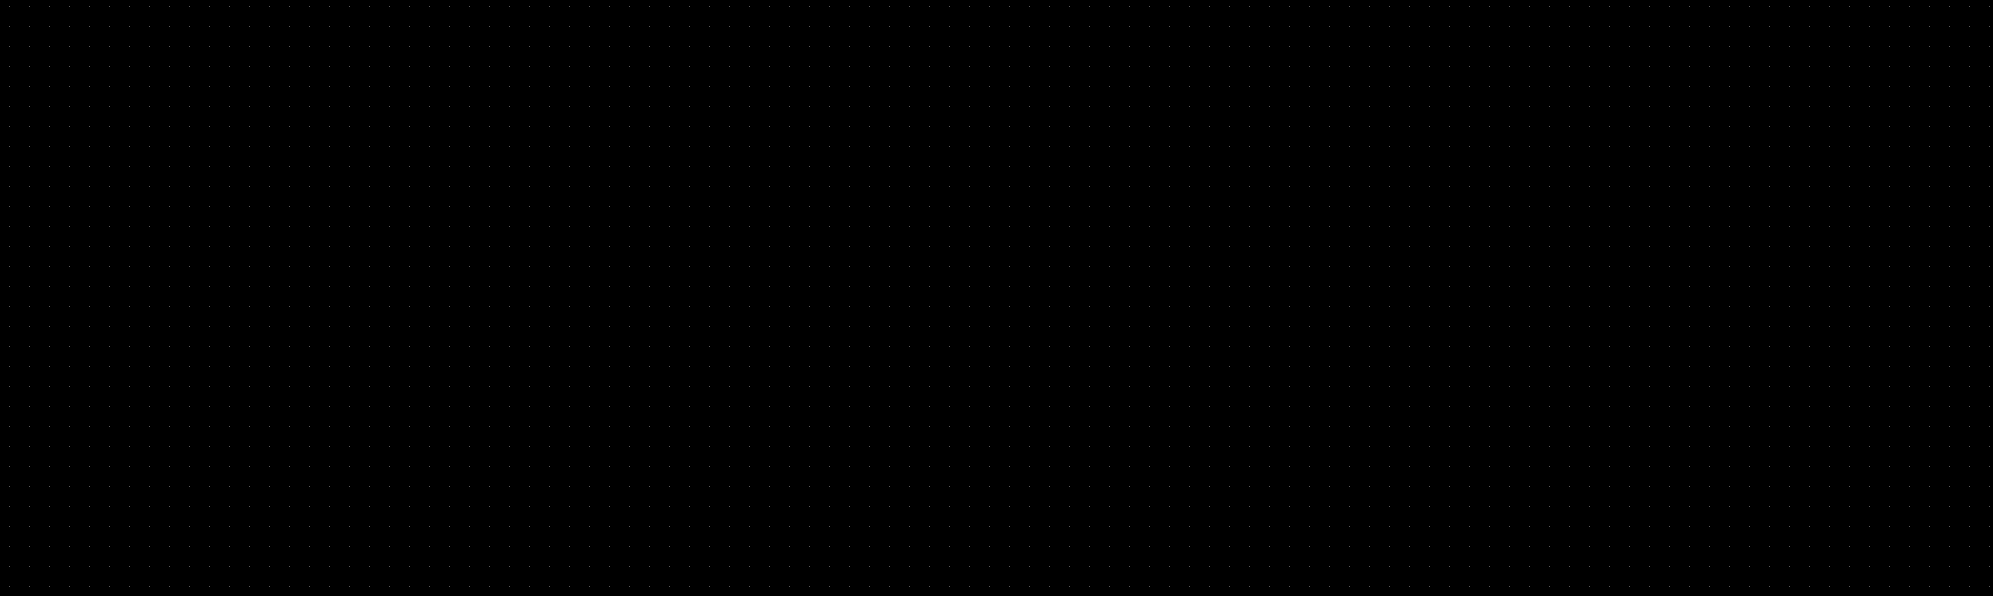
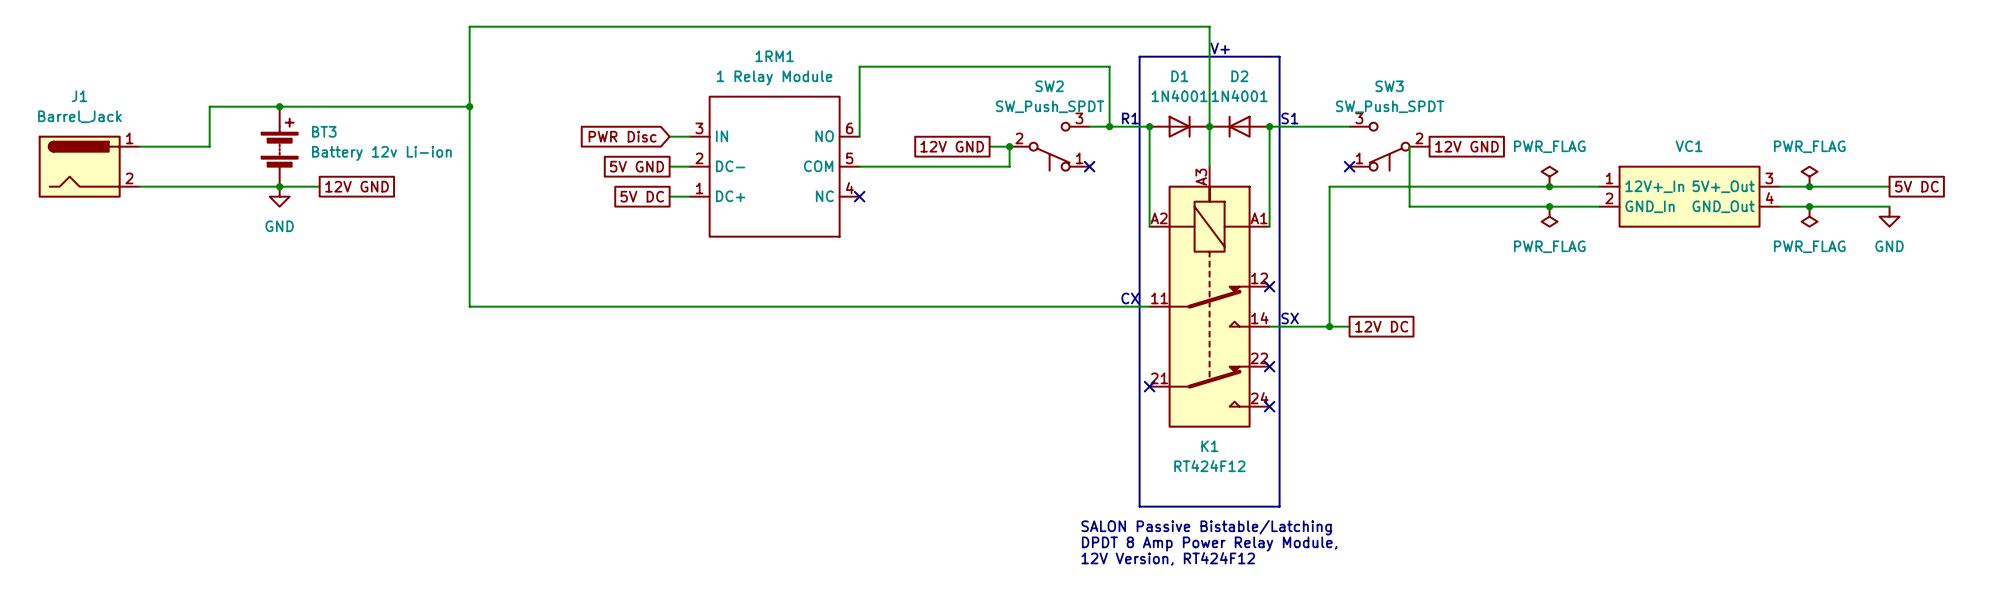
text: none -> V+ (1220, 48)
line: none -> (1139, 56) (1279, 56) (1279, 506) (1139, 506) (1139, 56)
junction: none -> (279, 106)
wire: none -> (469, 106) (209, 106) (209, 146) (139, 146)
junction: none -> (469, 106)
text: none -> R1 (1130, 118)
text: none -> S1 (1289, 118)
wire: none -> (1089, 126) (1149, 126) (1149, 226)
wire: none -> (1109, 126) (1109, 66) (859, 66) (859, 136)
junction: none -> (1109, 126)
junction: none -> (1149, 126)
D1: none -> 1N4001 (1179, 126)
junction: none -> (1209, 126)
D2: none -> 1N4001 (1239, 126)
junction: none -> (1269, 126)
wire: none -> (1349, 126) (1269, 126) (1269, 226)
global label: none -> PWR Disc (622, 136)
wire: none -> (669, 136) (689, 136)
BT3: none -> Battery 12v Li-ion (279, 146)
global label: none -> 12V GND (952, 146)
wire: none -> (989, 146) (1009, 146) (1009, 166) (859, 166)
junction: none -> (1009, 146)
SW2: none -> SW_Push_SPDT (1049, 146)
SW3: none -> SW_Push_SPDT (1389, 146)
wire: none -> (1409, 146) (1409, 206) (1599, 206)
global label: none -> 12V GND (1466, 146)
J1: none -> Barrel_Jack (89, 166)
global label: none -> 5V GND (637, 166)
wire: none -> (669, 166) (689, 166)
1RM1: none -> 1 Relay Module (774, 166)
no-connect mark: none -> (1089, 166)
wire: none -> (1209, 166) (1209, 26) (469, 26) (469, 306) (1149, 306)
no-connect mark: none -> (1349, 166)
power symbol: none -> PWR_FLAG (1549, 176)
power symbol: none -> PWR_FLAG (1809, 176)
wire: none -> (139, 186) (319, 186)
junction: none -> (279, 186)
global label: none -> 12V GND (357, 186)
junction: none -> (1549, 186)
wire: none -> (1599, 186) (1329, 186) (1329, 326)
wire: none -> (1779, 186) (1889, 186)
junction: none -> (1809, 186)
global label: none -> 5V DC (1916, 186)
power symbol: none -> GND (279, 196)
global label: none -> 5V DC (642, 196)
wire: none -> (669, 196) (689, 196)
no-connect mark: none -> (859, 196)
VC1: none -> (1689, 196)
junction: none -> (1549, 206)
wire: none -> (1779, 206) (1889, 206)
junction: none -> (1809, 206)
power symbol: none -> PWR_FLAG (1549, 216)
power symbol: none -> PWR_FLAG (1809, 216)
power symbol: none -> GND (1889, 216)
no-connect mark: none -> (1269, 286)
K1: none -> RT424F12 (1209, 297)
text: none -> CX (1130, 298)
text: none -> SX (1290, 318)
wire: none -> (1269, 326) (1349, 326)
junction: none -> (1329, 326)
global label: none -> 12V DC (1381, 326)
no-connect mark: none -> (1269, 366)
no-connect mark: none -> (1149, 386)
no-connect mark: none -> (1269, 406)
text: none -> SALON Passive Bistable/Latching (1206, 527)
text: none -> DPDT 8 Amp Power Relay Module, (1209, 544)
text: none -> 12V Version, RT424F12 (1168, 558)

